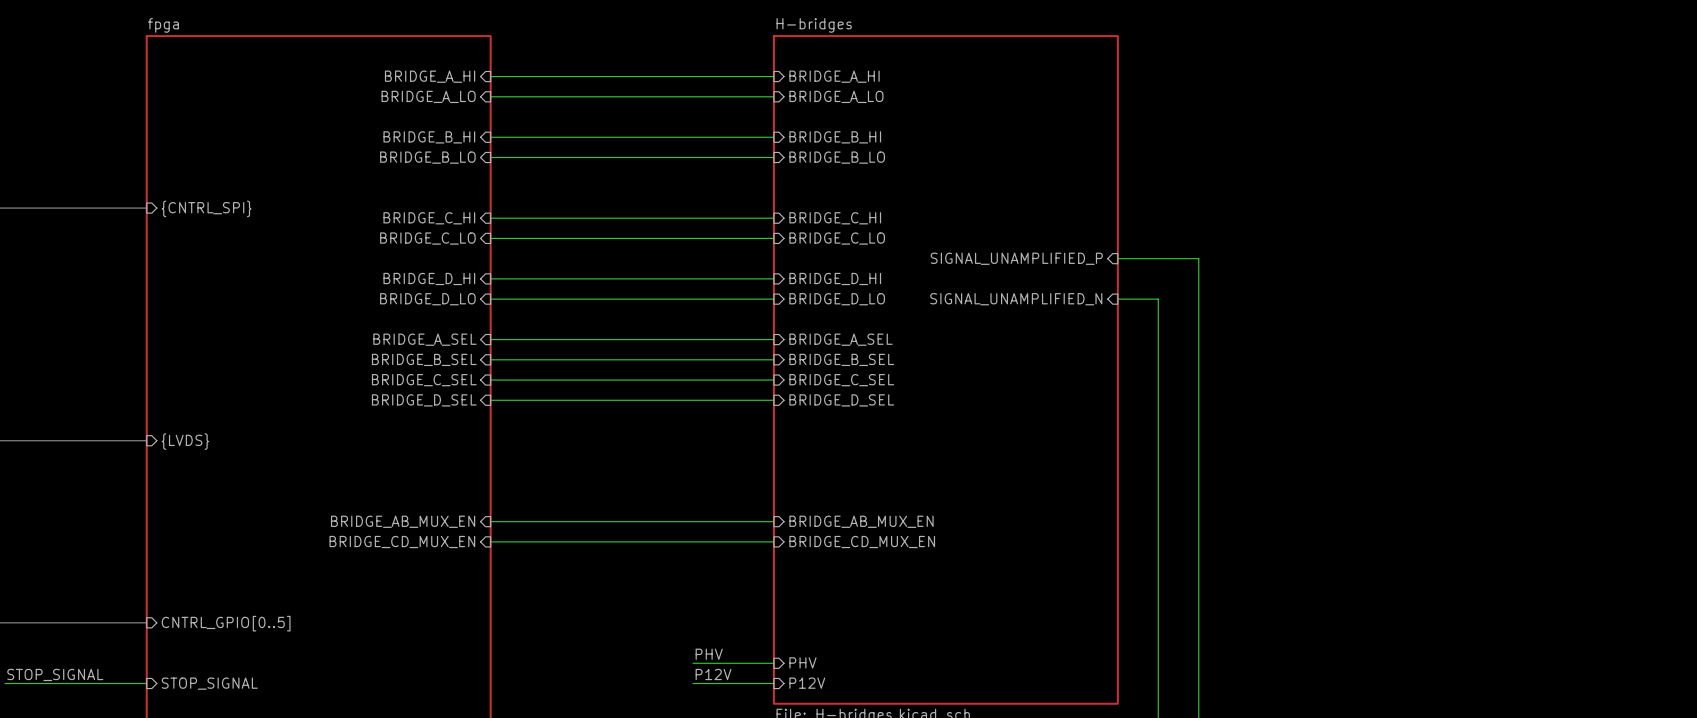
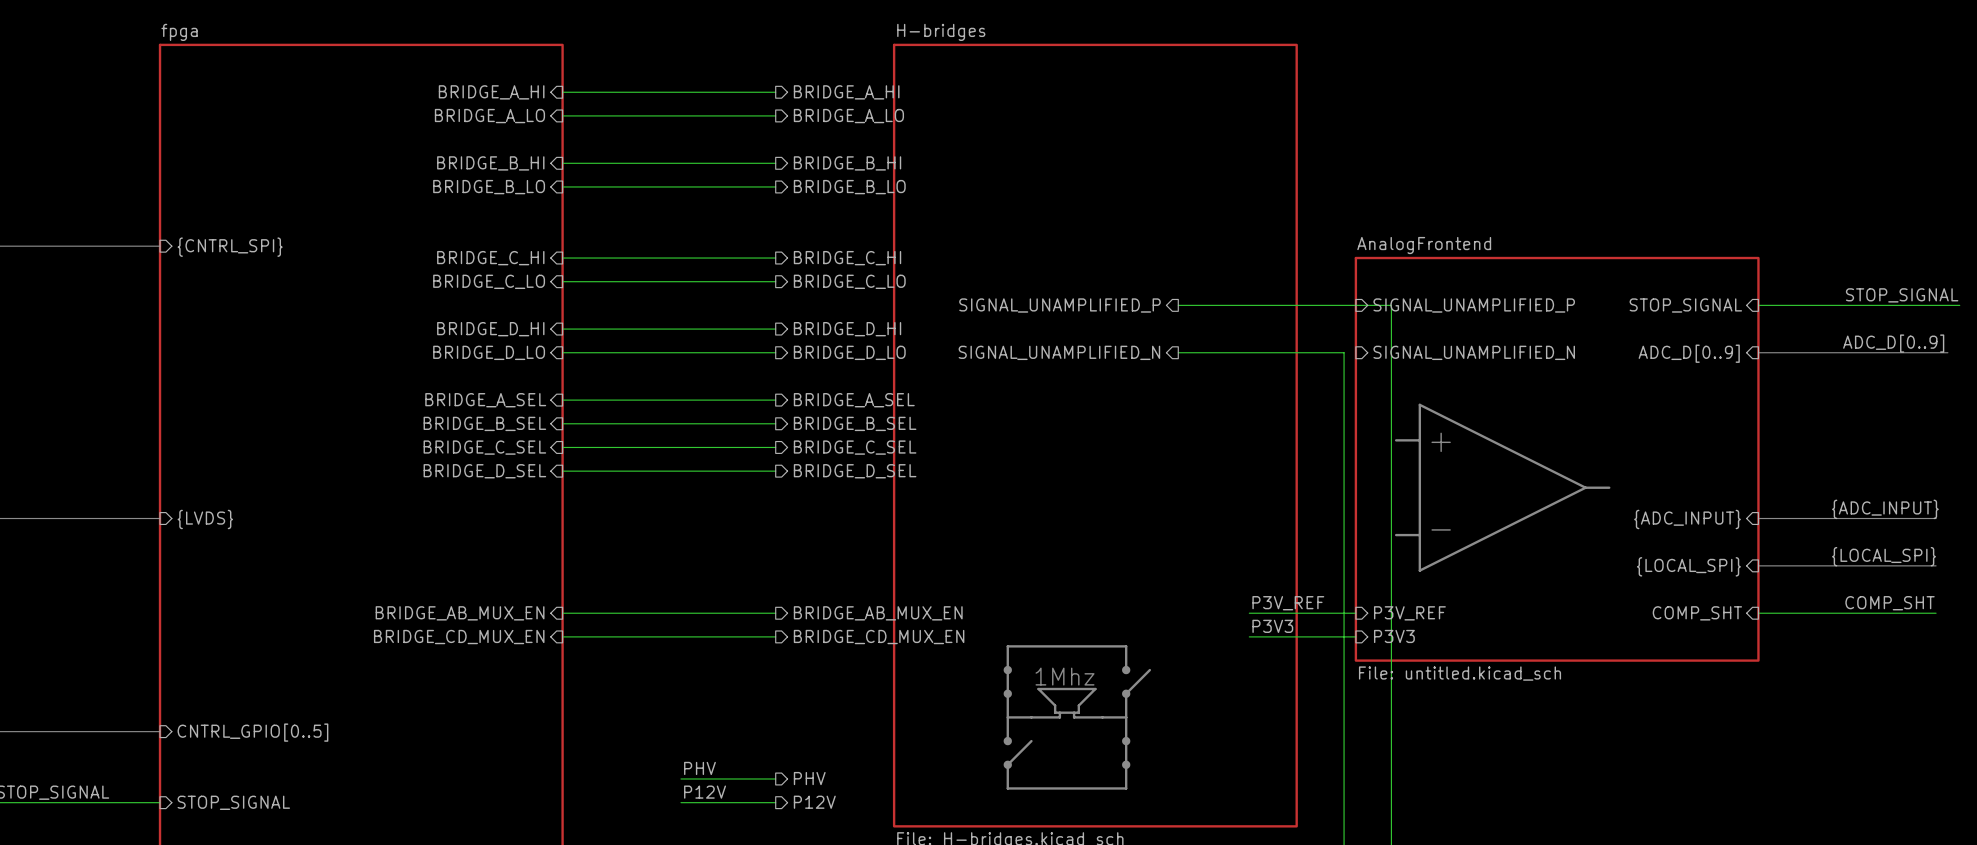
wire: (672, 76) (773, 76) -> none
sheet pin position: BRIDGE_A_HI (834, 76) -> BRIDGE_A_HI (846, 92)
wire: (672, 96) (773, 96) -> none
sheet pin position: BRIDGE_A_LO (836, 96) -> BRIDGE_A_LO (848, 116)
wire: (672, 137) (773, 137) -> none
sheet pin position: BRIDGE_B_HI (835, 137) -> BRIDGE_B_HI (847, 163)
wire: (672, 157) (773, 157) -> none
sheet pin position: BRIDGE_B_LO (837, 157) -> BRIDGE_B_LO (849, 187)
wire: (672, 218) (773, 218) -> none
sheet pin position: BRIDGE_C_HI (835, 218) -> BRIDGE_C_HI (847, 258)
wire: (672, 238) (773, 238) -> none
sheet pin position: BRIDGE_C_LO (837, 238) -> BRIDGE_C_LO (849, 281)
label: none -> STOP_SIGNAL (1902, 295)
wire: none -> (1178, 305) (1296, 305)
sheet pin position: SIGNAL_UNAMPLIFIED_P (1016, 258) -> SIGNAL_UNAMPLIFIED_P (1059, 305)
sheet pin: none -> SIGNAL_UNAMPLIFIED_P (1474, 305)
sheet pin: none -> STOP_SIGNAL (1685, 305)
wire: none -> (1758, 305) (1959, 305)
wire: (672, 278) (773, 278) -> none
sheet pin position: BRIDGE_D_HI (835, 278) -> BRIDGE_D_HI (847, 329)
label: none -> ADC_D[0..9] (1893, 343)
wire: (672, 299) (773, 299) -> none
sheet pin position: BRIDGE_D_LO (837, 299) -> BRIDGE_D_LO (849, 352)
wire: none -> (1178, 352) (1296, 352)
sheet pin position: SIGNAL_UNAMPLIFIED_N (1016, 299) -> SIGNAL_UNAMPLIFIED_N (1059, 352)
sheet pin: none -> SIGNAL_UNAMPLIFIED_N (1474, 352)
sheet pin: none -> ADC_D[0..9] (1689, 353)
bus: none -> (1758, 352) (1947, 352)
wire: (672, 339) (773, 339) -> none
sheet pin position: BRIDGE_A_SEL (841, 339) -> BRIDGE_A_SEL (854, 400)
wire: (672, 359) (773, 359) -> none
sheet pin position: BRIDGE_B_SEL (841, 359) -> BRIDGE_B_SEL (855, 423)
line: none -> (1396, 440) (1419, 440)
text: none -> + (1441, 442)
wire: (672, 380) (773, 380) -> none
sheet pin position: BRIDGE_C_SEL (841, 380) -> BRIDGE_C_SEL (855, 447)
sheet AnalogFrontend: none -> File: untitled.kicad_sch (1557, 459)
wire: (672, 400) (773, 400) -> none
sheet pin position: BRIDGE_D_SEL (841, 400) -> BRIDGE_D_SEL (855, 471)
line: none -> (1585, 487) (1419, 404) (1419, 570) (1585, 487)
line: none -> (1585, 487) (1609, 487)
label: none -> {ADC_INPUT} (1885, 509)
bus: none -> (1758, 518) (1936, 518)
sheet pin: none -> {ADC_INPUT} (1687, 519)
text: none -> - (1441, 529)
line: none -> (1396, 535) (1419, 535)
label: none -> {LOCAL_SPI} (1884, 556)
bus: none -> (1758, 565) (1936, 565)
sheet pin: none -> {LOCAL_SPI} (1688, 566)
label: none -> P3V_REF (1288, 603)
label: none -> COMP_SHT (1890, 603)
wire: (672, 521) (773, 521) -> none
sheet pin position: BRIDGE_AB_MUX_EN (861, 521) -> BRIDGE_AB_MUX_EN (878, 613)
wire: none -> (1249, 613) (1355, 613)
sheet pin: none -> P3V_REF (1409, 613)
sheet pin: none -> COMP_SHT (1697, 613)
wire: none -> (1758, 613) (1936, 613)
label: none -> P3V3 (1272, 626)
wire: (672, 541) (773, 541) -> none
wire: none -> (1249, 636) (1355, 636)
sheet pin: none -> P3V3 (1394, 636)
sheet pin position: BRIDGE_CD_MUX_EN (862, 542) -> BRIDGE_CD_MUX_EN (879, 637)
drawing: none -> [1003, 665, 1012, 675]
drawing: none -> [1122, 665, 1131, 675]
line: none -> (1126, 670) (1126, 646) (1007, 646) (1007, 741)
line: none -> (1149, 670) (1126, 693) (1126, 788) (1007, 788) (1007, 764) (1031, 741)
text: none -> 1Mhz (1065, 676)
drawing: none -> [1003, 689, 1012, 698]
line: none -> (1038, 689) (1095, 689) (1078, 705) (1078, 712) (1055, 712) (1055, 705) (1038, 689)
drawing: none -> [1122, 689, 1131, 698]
line: none -> (1059, 712) (1059, 717) (1007, 717)
line: none -> (1074, 712) (1074, 717) (1126, 717)
drawing: none -> [1003, 736, 1012, 746]
drawing: none -> [1122, 736, 1131, 746]
drawing: none -> [1003, 760, 1012, 769]
drawing: none -> [1122, 760, 1131, 769]
label position: PHV (709, 654) -> PHV (699, 768)
sheet pin position: PHV (802, 662) -> PHV (809, 778)
wire: (692, 663) (773, 663) -> (680, 778) (775, 778)
label position: P12V (713, 674) -> P12V (705, 792)
wire: (692, 683) (773, 683) -> (680, 802) (775, 802)
sheet pin position: P12V (807, 683) -> P12V (814, 802)

